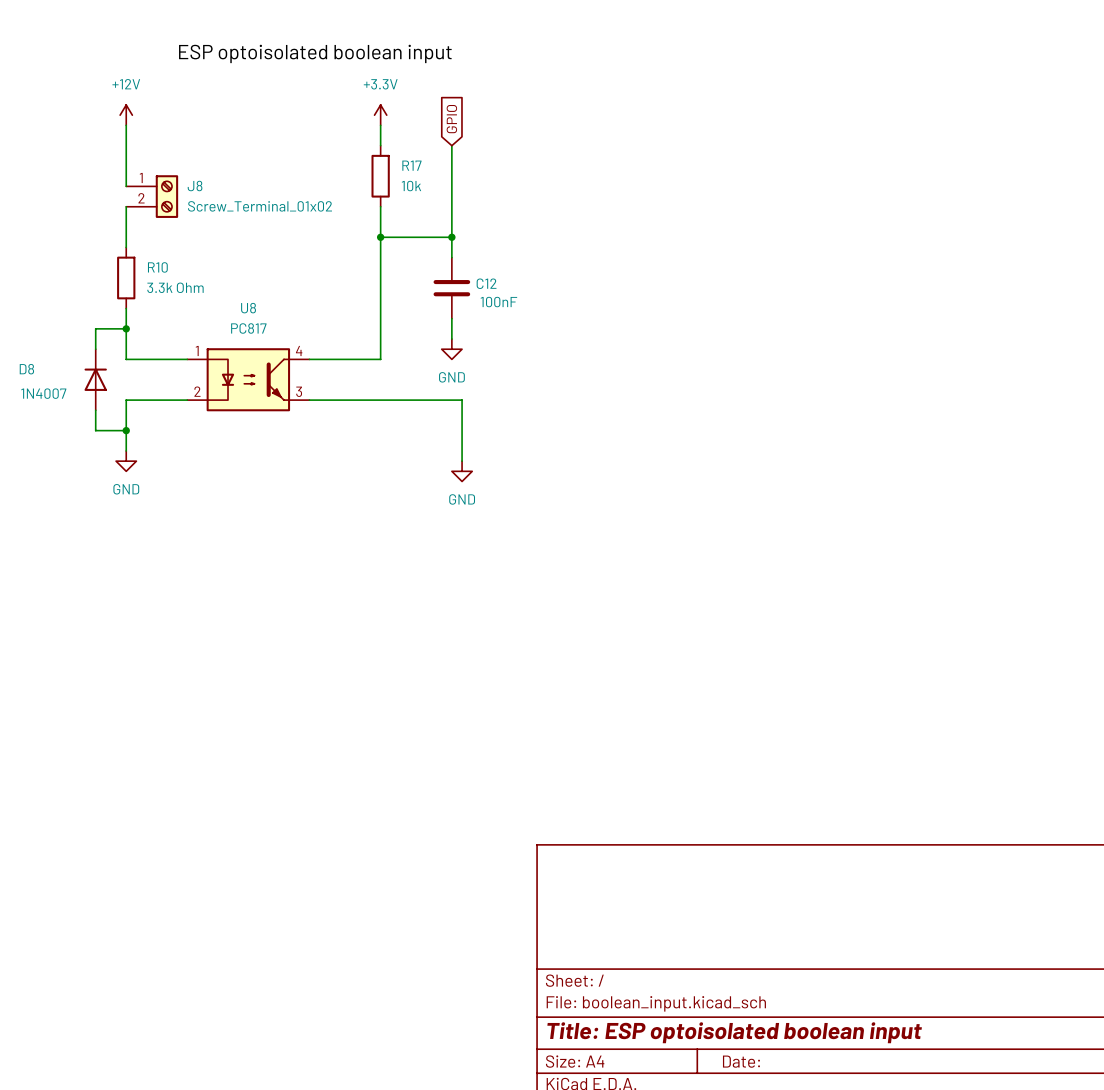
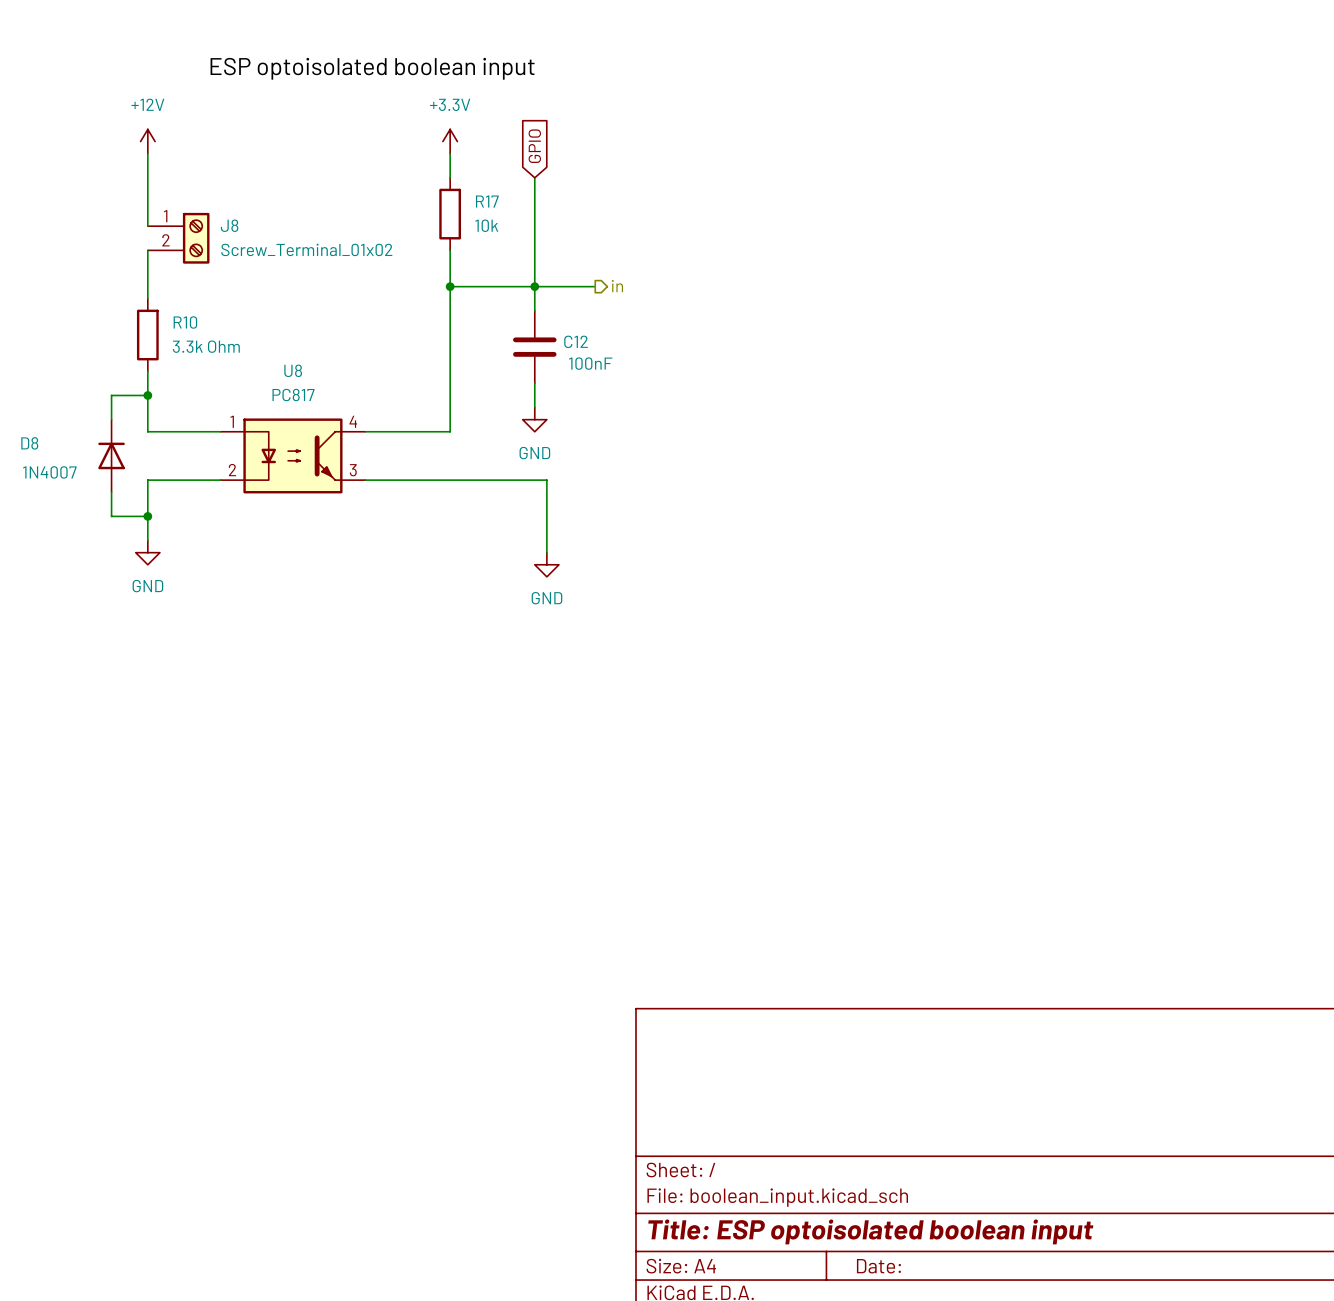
hierarchical label: none -> in (617, 286)
wire: none -> (534, 286) (595, 286)

